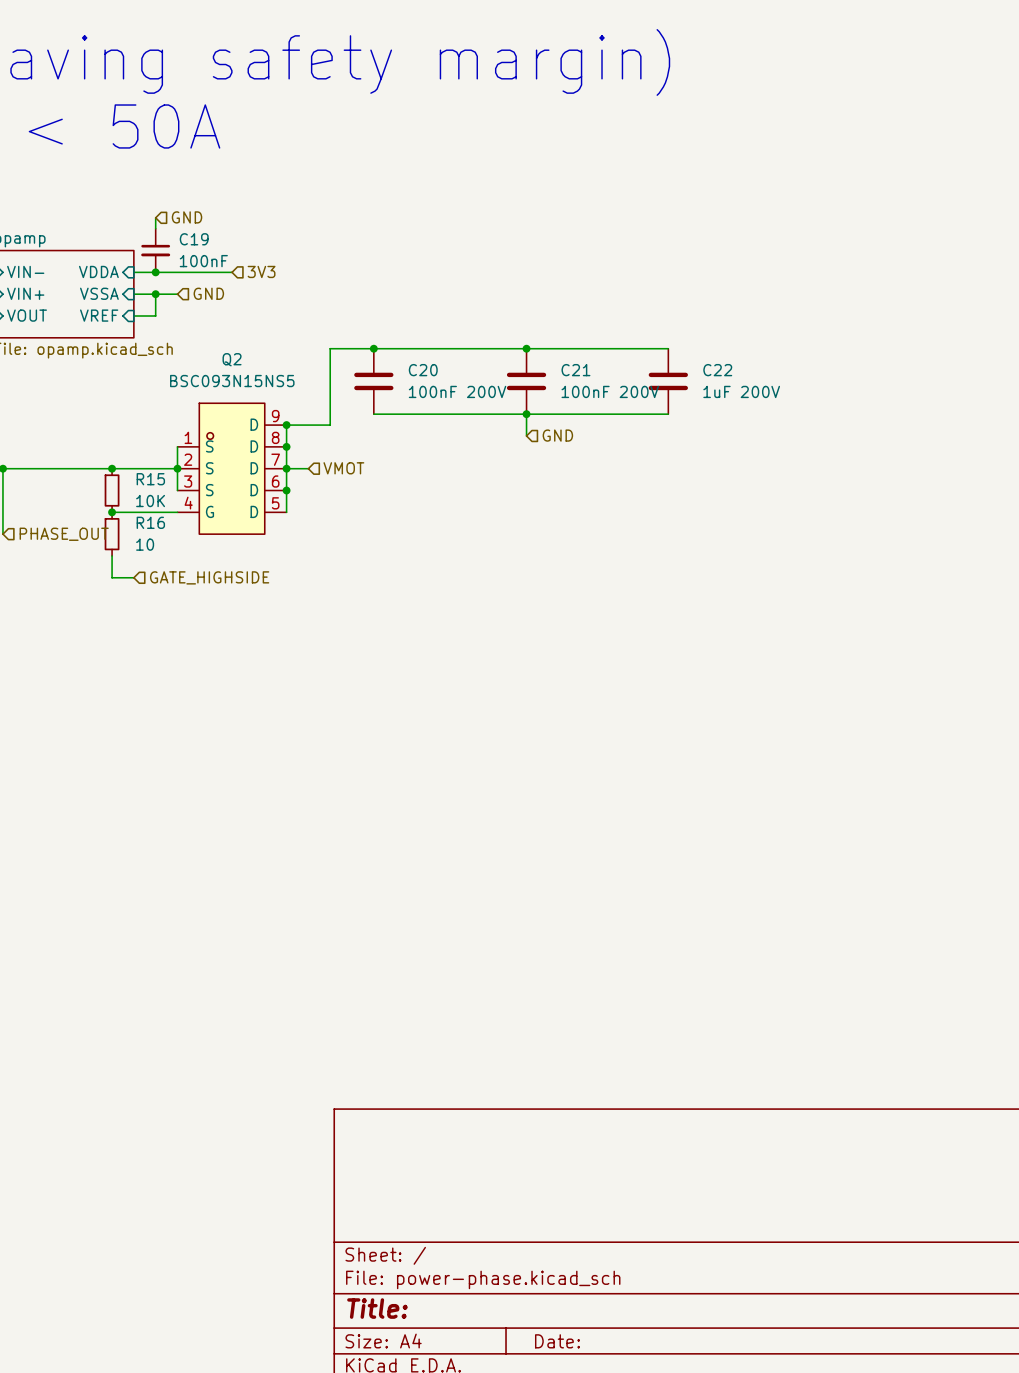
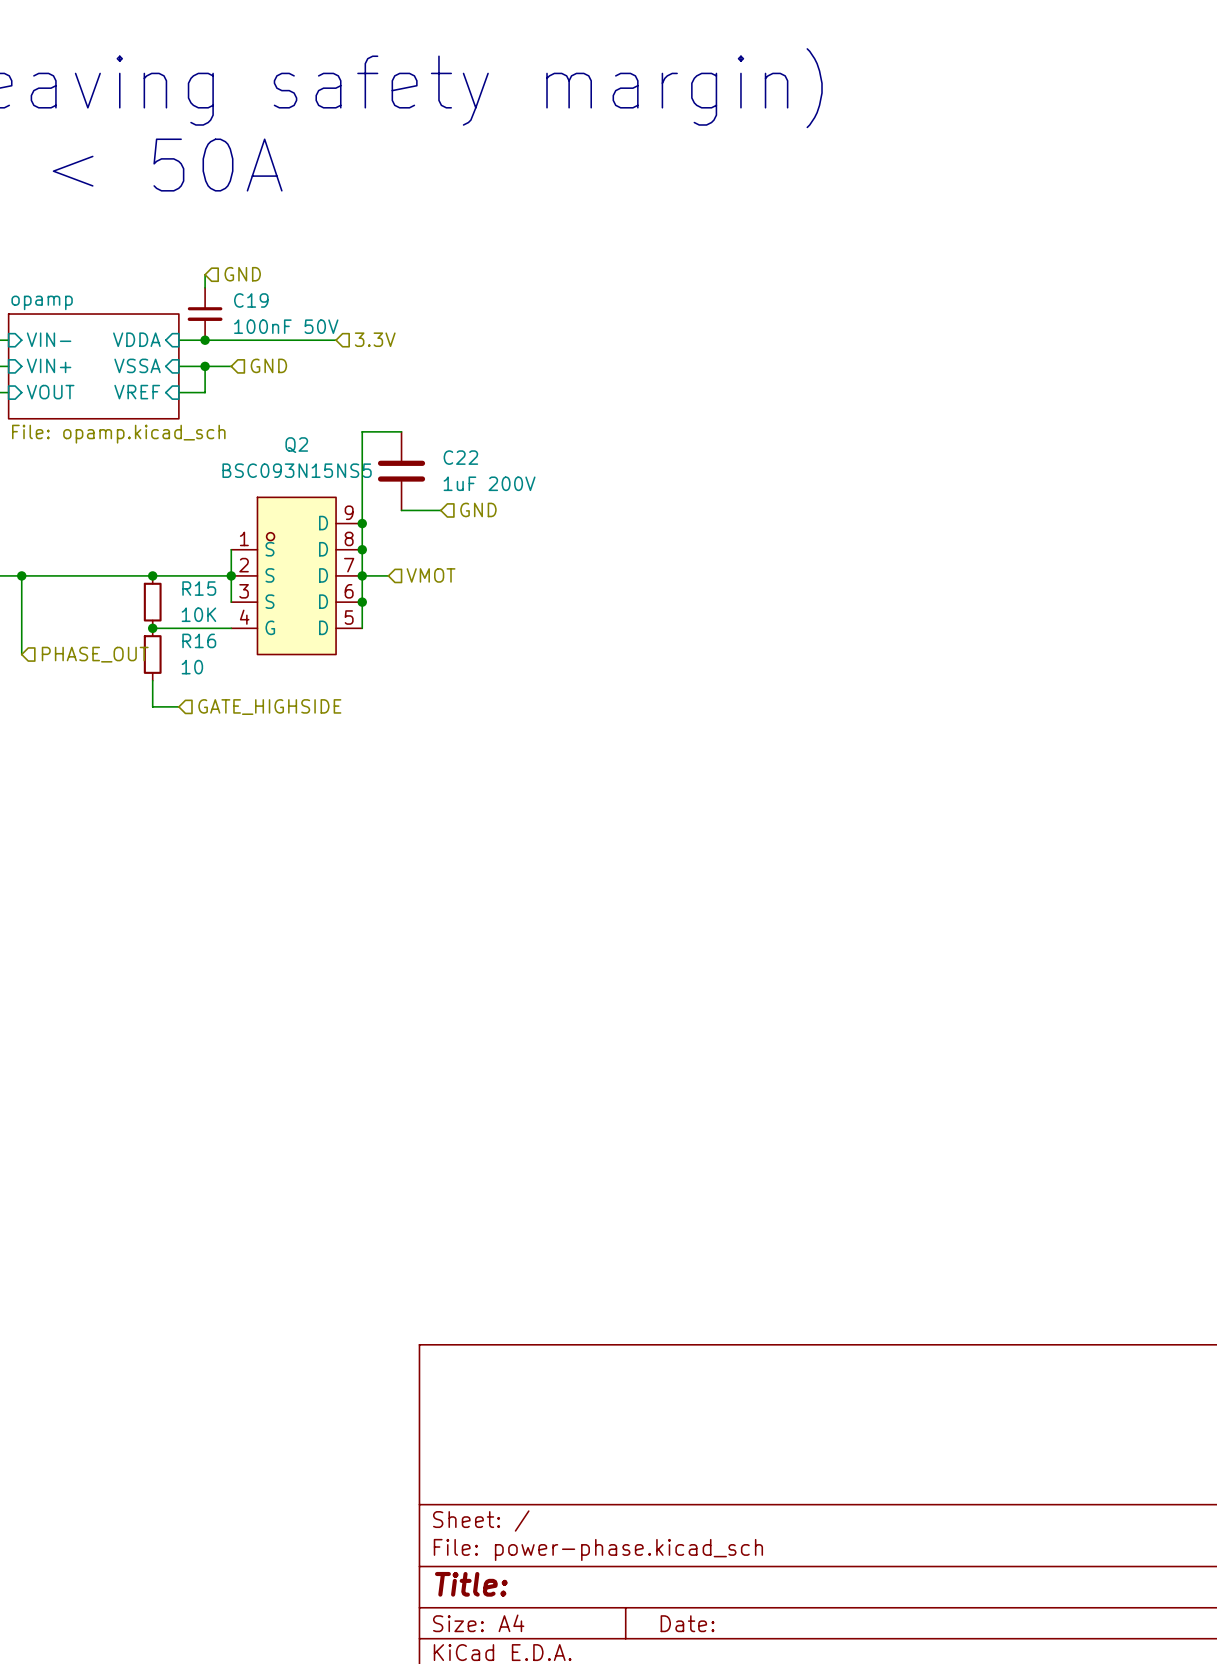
C19 value: 100nF (203, 261) -> 100nF 50V (286, 326)
hierarchical label: 3V3 (261, 271) -> none
hierarchical label: none -> 3.3V (375, 339)
wire: none -> (296, 340) (336, 340)
junction: (373, 348) -> none
junction: (526, 348) -> none
wire: (668, 348) (330, 348) (330, 425) (286, 425) -> (401, 431) (362, 431) (362, 523)
C20: 100nF 200V (373, 381) -> none
C21: 100nF 200V (526, 381) -> none
C22 position: (668, 381) -> (401, 471)
wire: none -> (401, 510) (440, 510)
wire: (373, 414) (668, 414) -> none
wire: (526, 414) (526, 435) -> none
junction: (526, 414) -> none
hierarchical label position: GND (557, 435) -> GND (478, 509)

